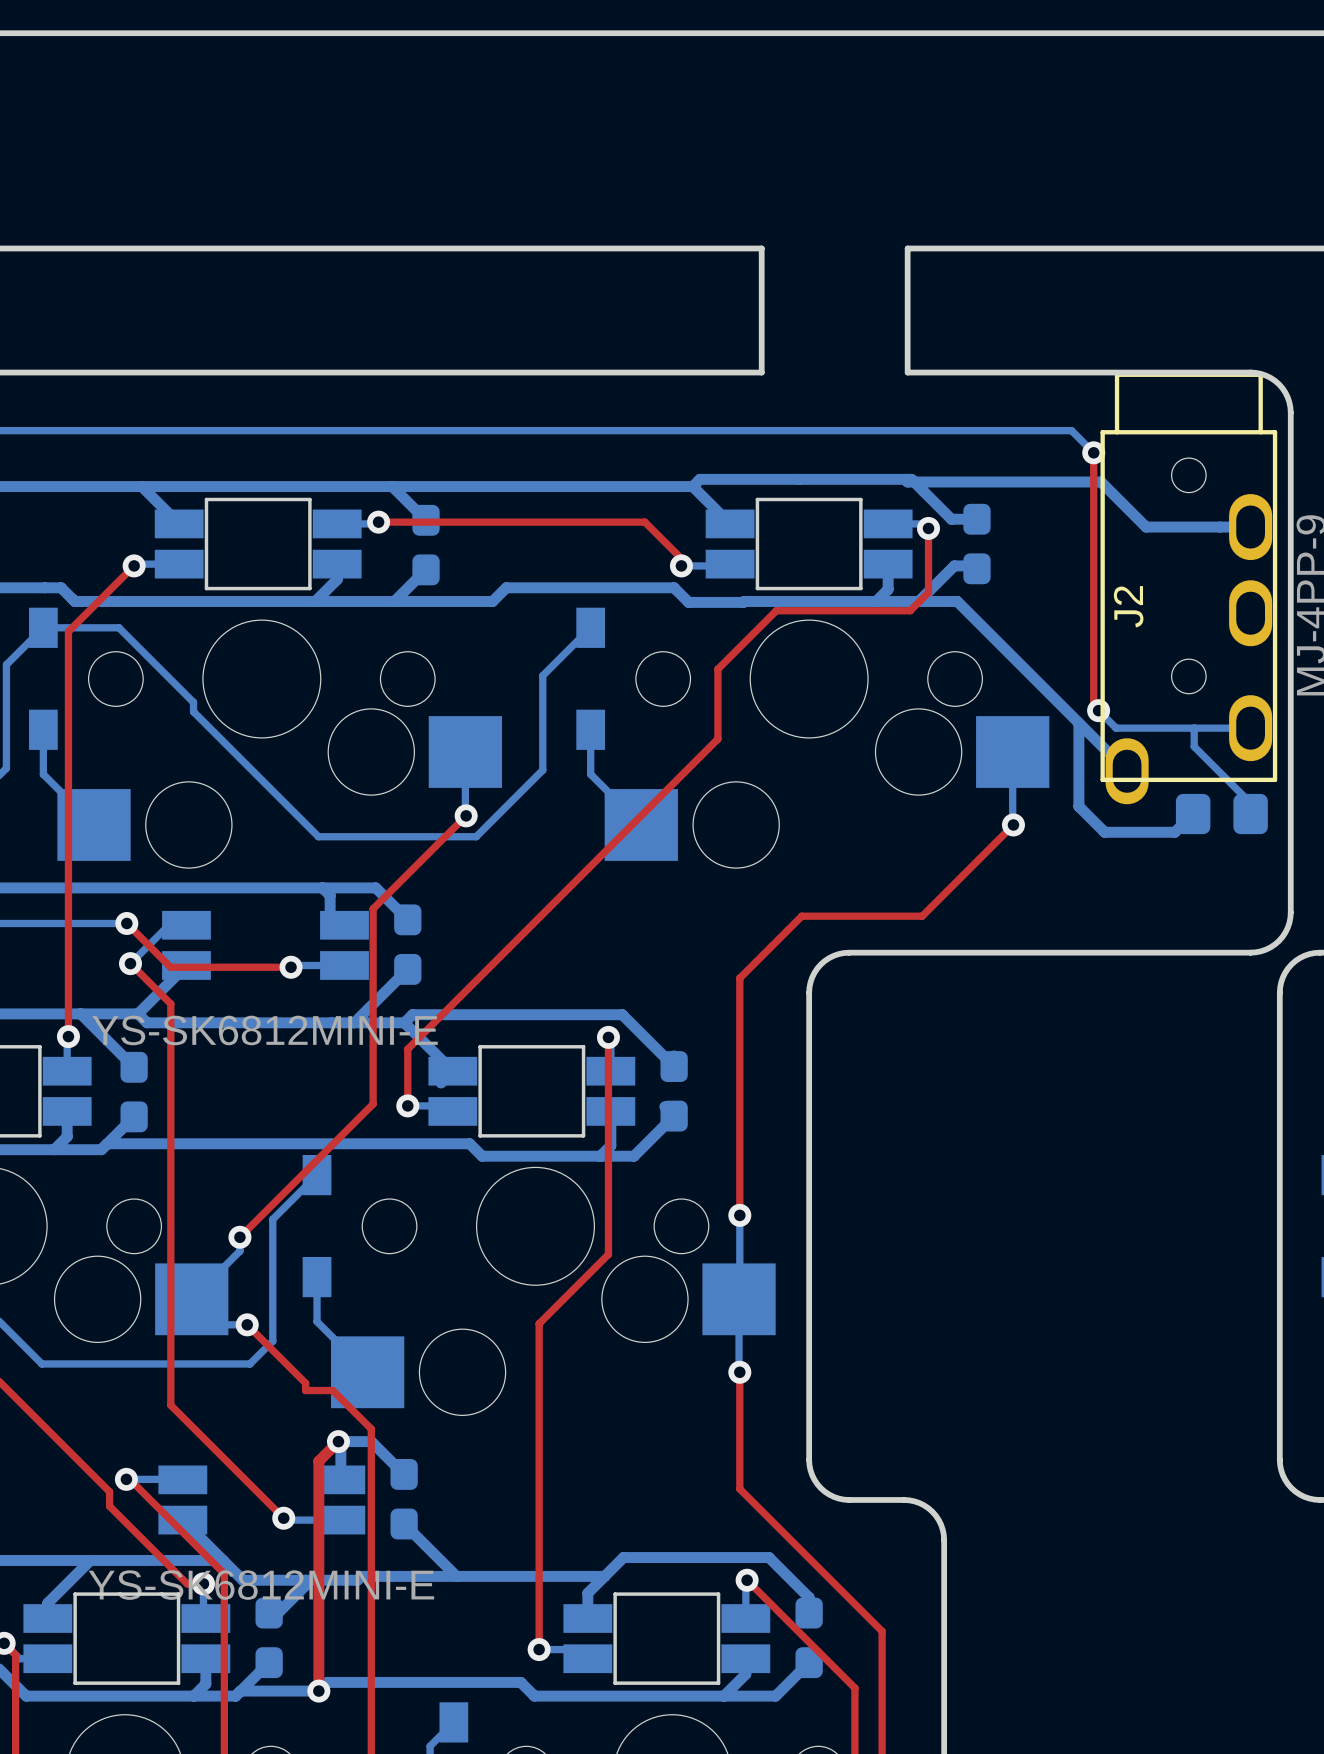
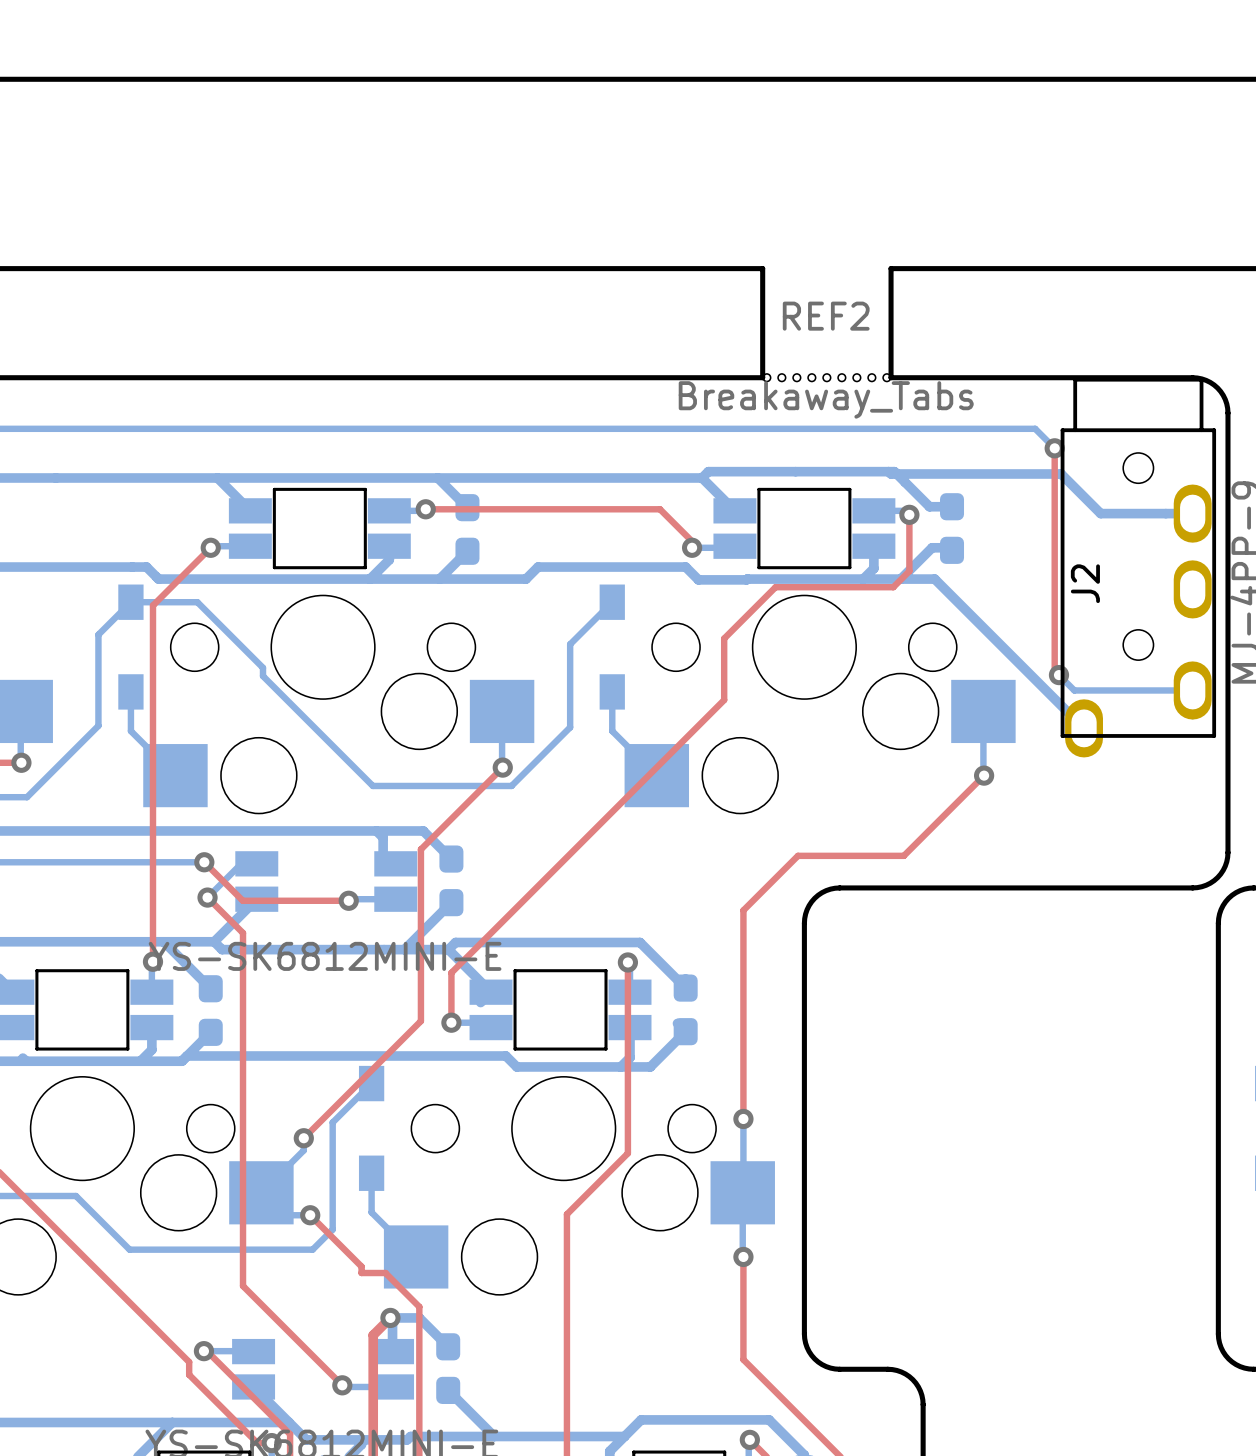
REF2: none -> Breakaway_Tabs (826, 377)
bottom track: (1078, 723) (1078, 806) (1104, 832) (1174, 832) (1193, 814) -> none
bottom track: (1194, 728) (1194, 746) (1250, 803) (1250, 814) -> none
part: (1221, 814) -> none

